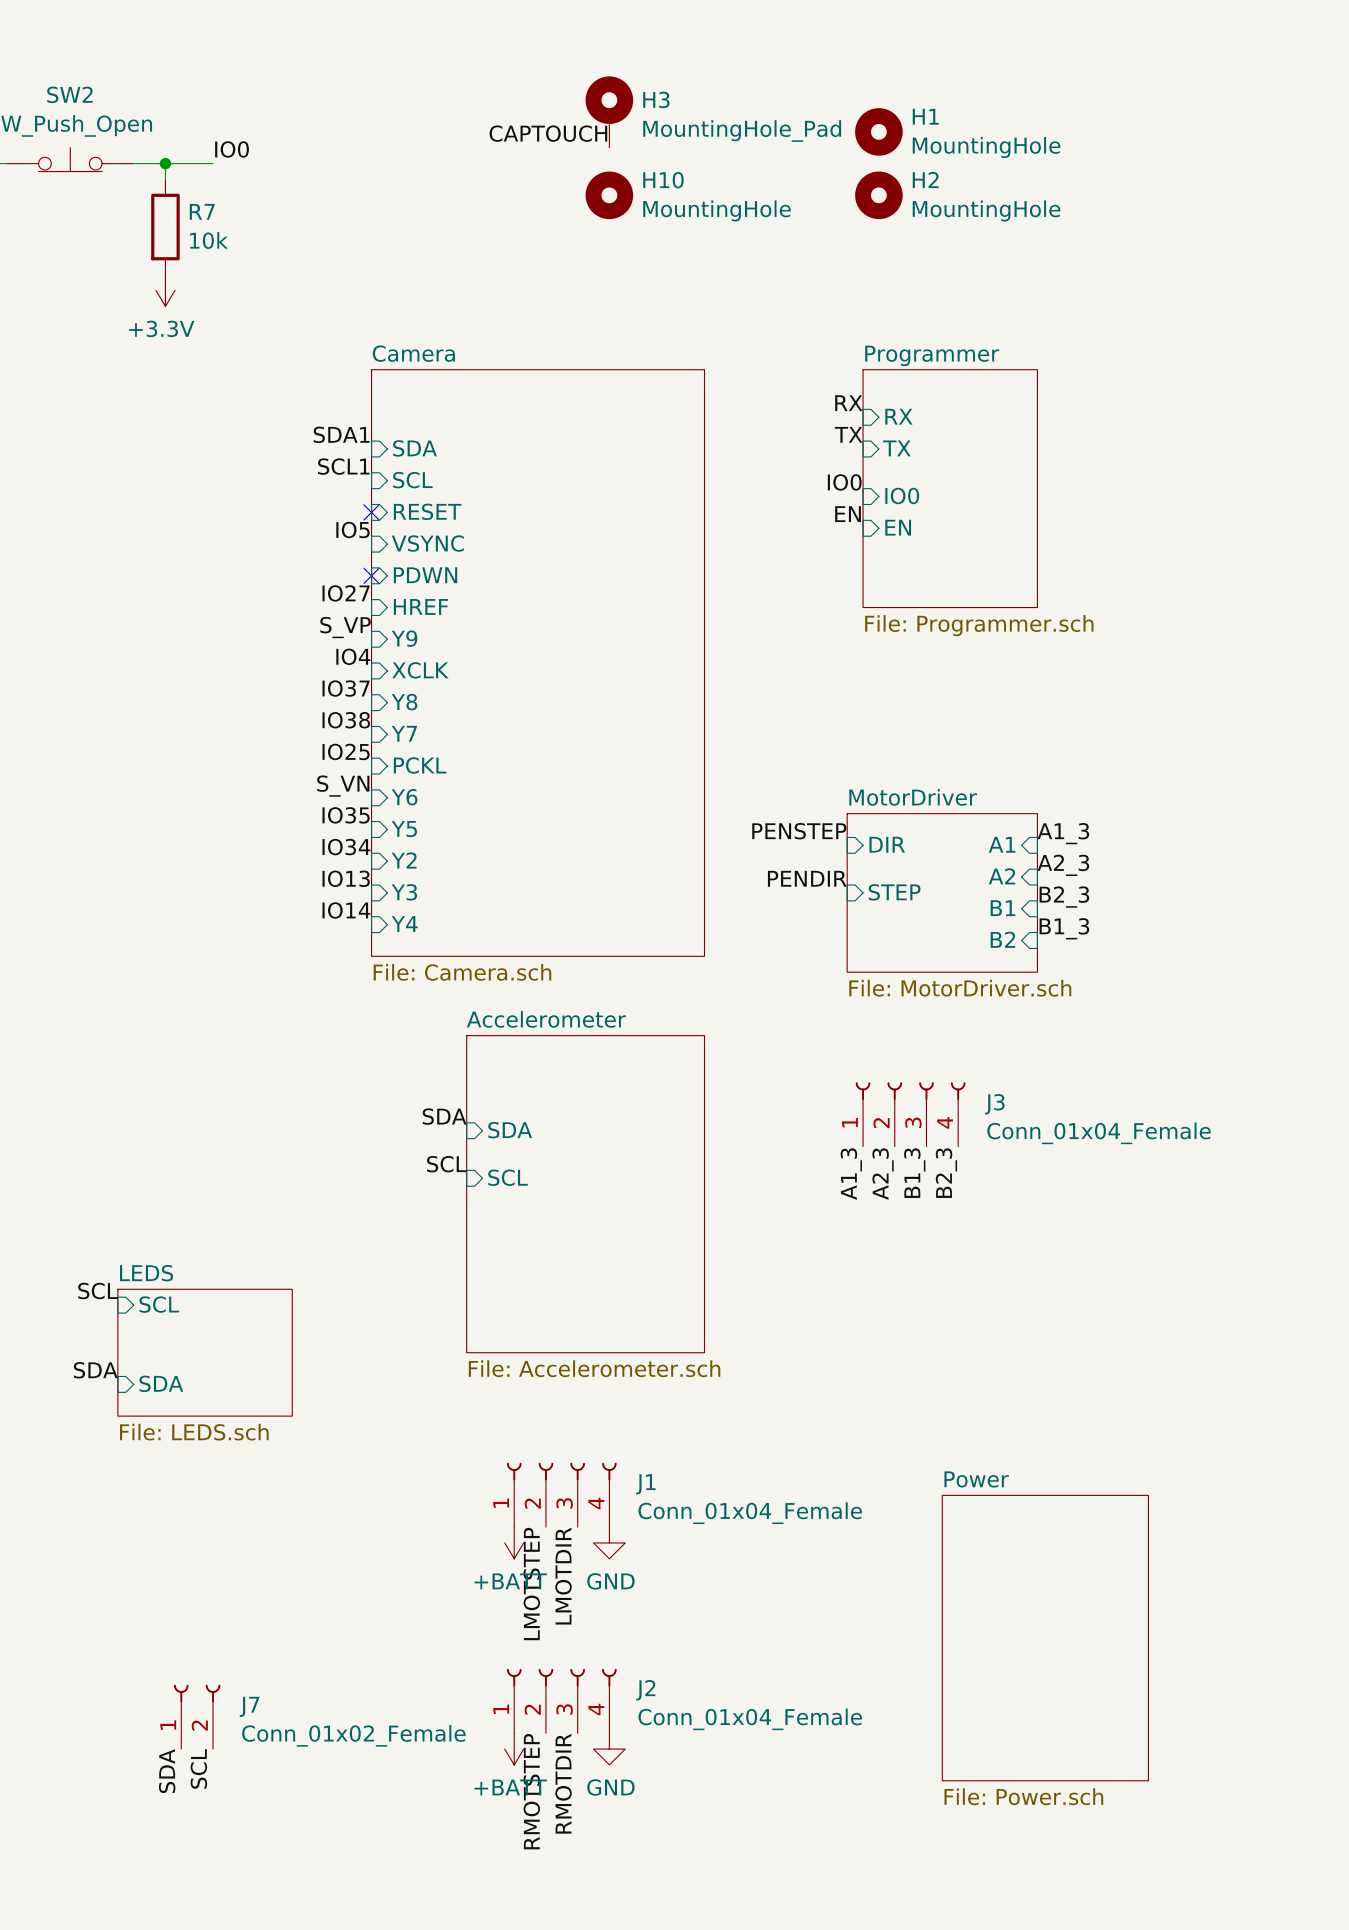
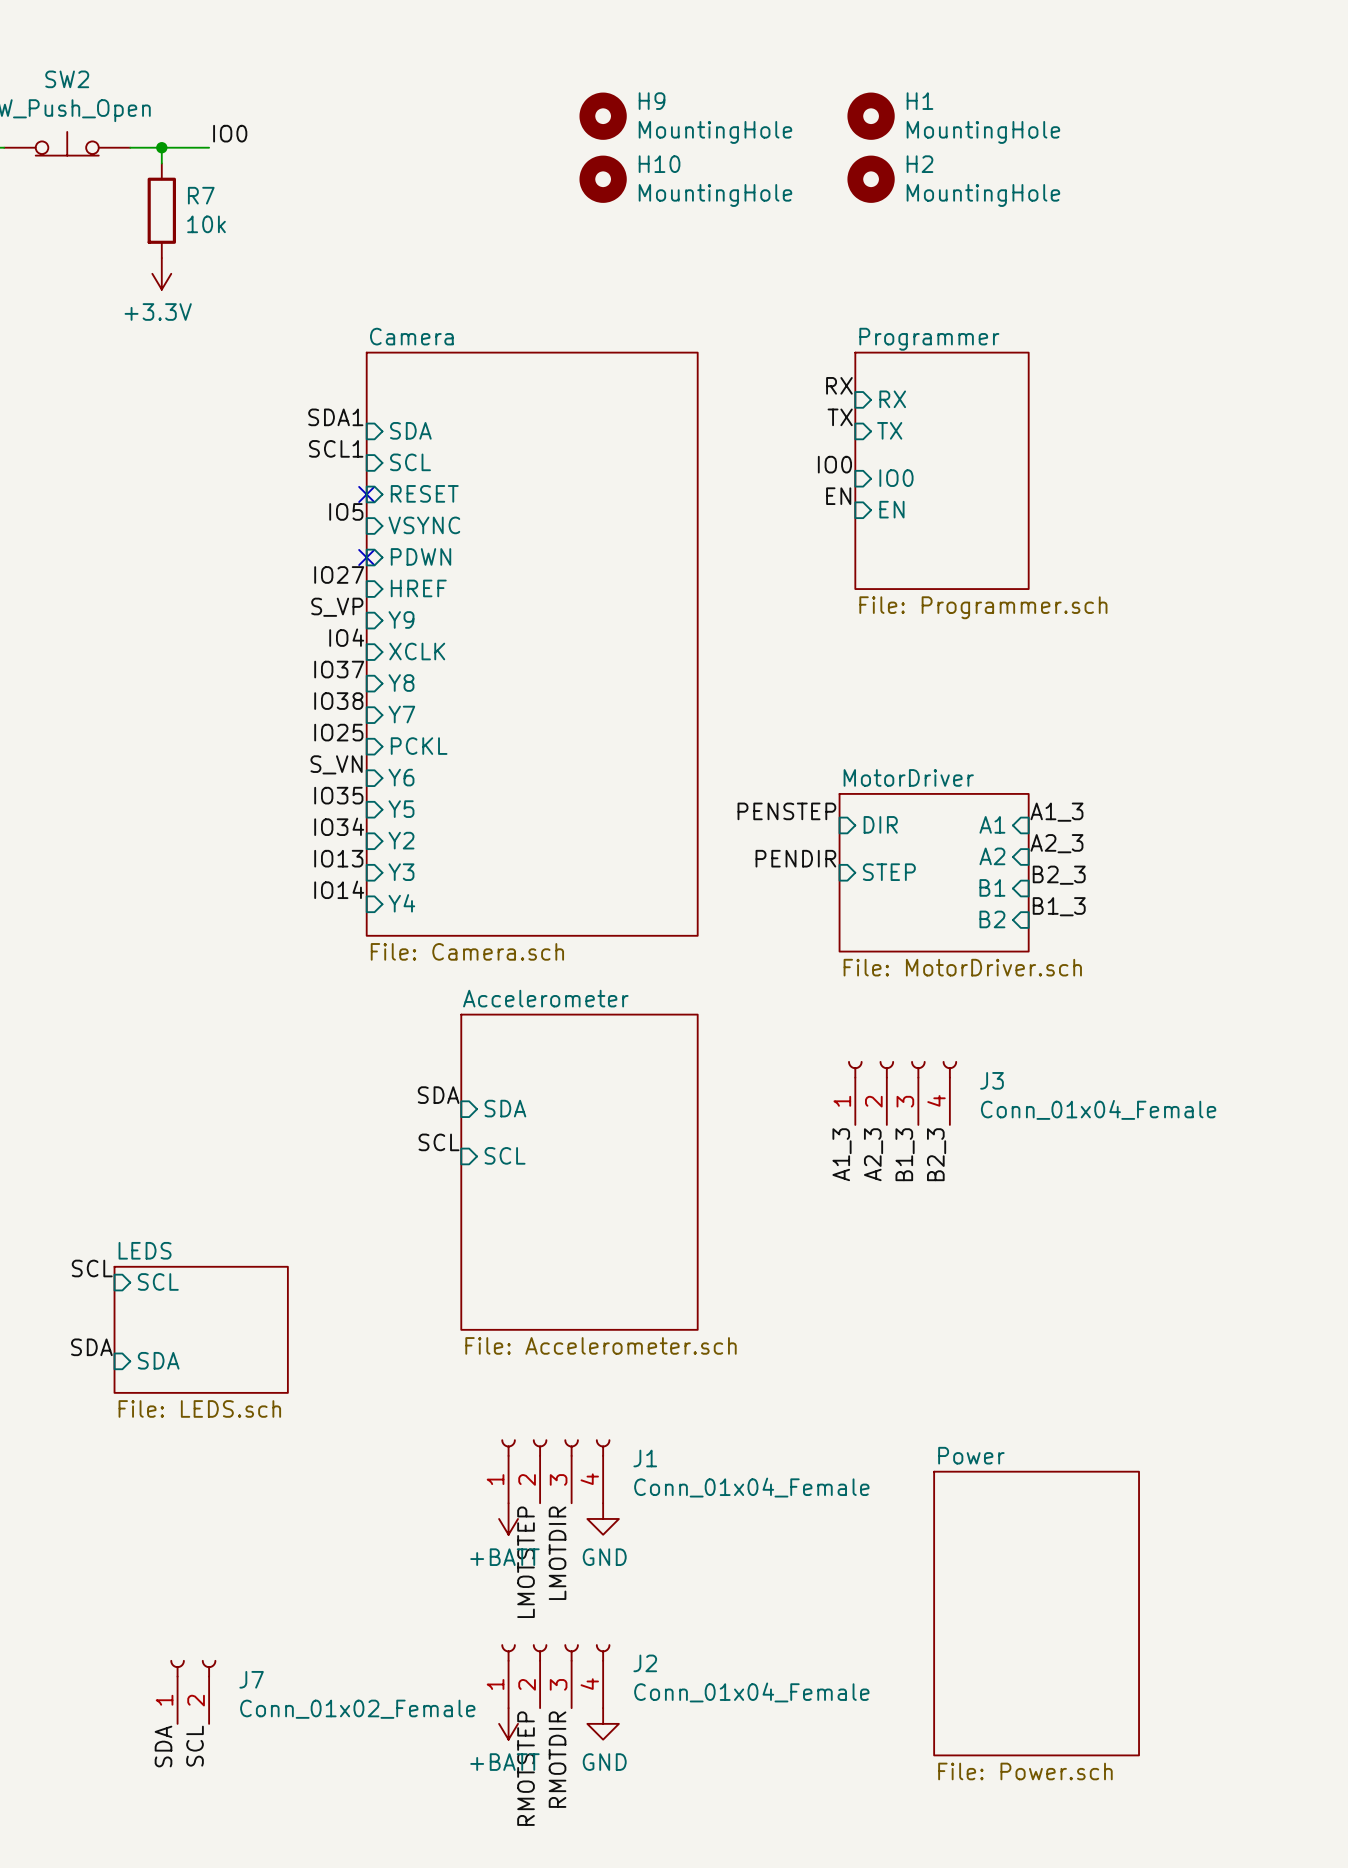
H3: MountingHole_Pad (609, 112) -> none
H9: none -> MountingHole (603, 116)
label: CAPTOUCH (548, 133) -> none

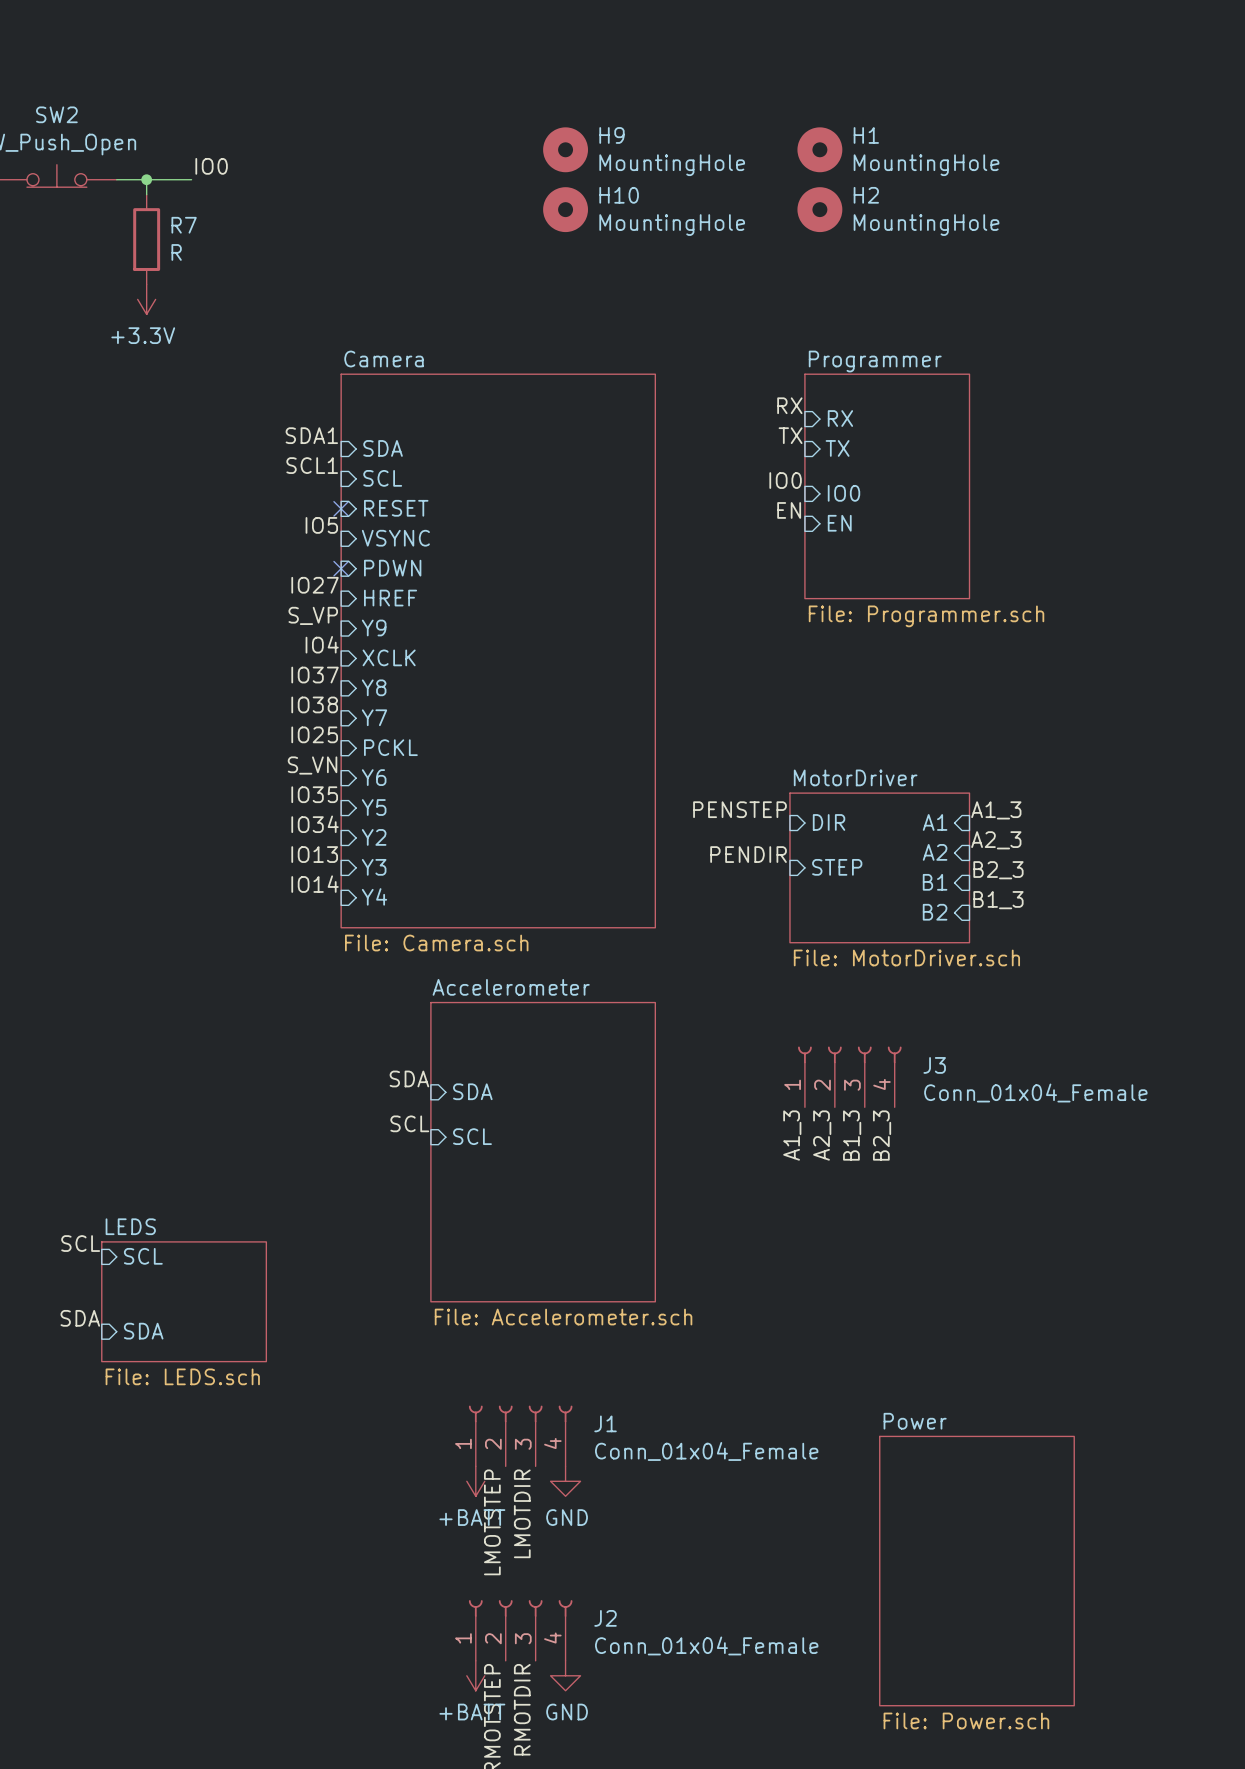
R7 value: 10k (206, 224) -> R (176, 252)
J7: Conn_01x02_Female (193, 1691) -> none
label: SDA (163, 1746) -> none
label: SCL (195, 1746) -> none

